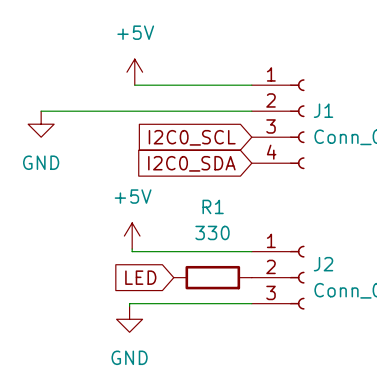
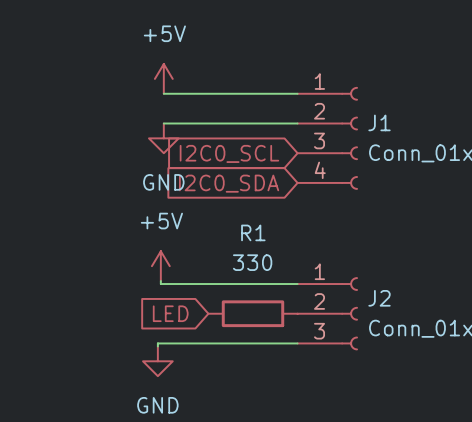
wire: (41, 111) (134, 111) -> none
power symbol position: GND (41, 124) -> GND (163, 138)

